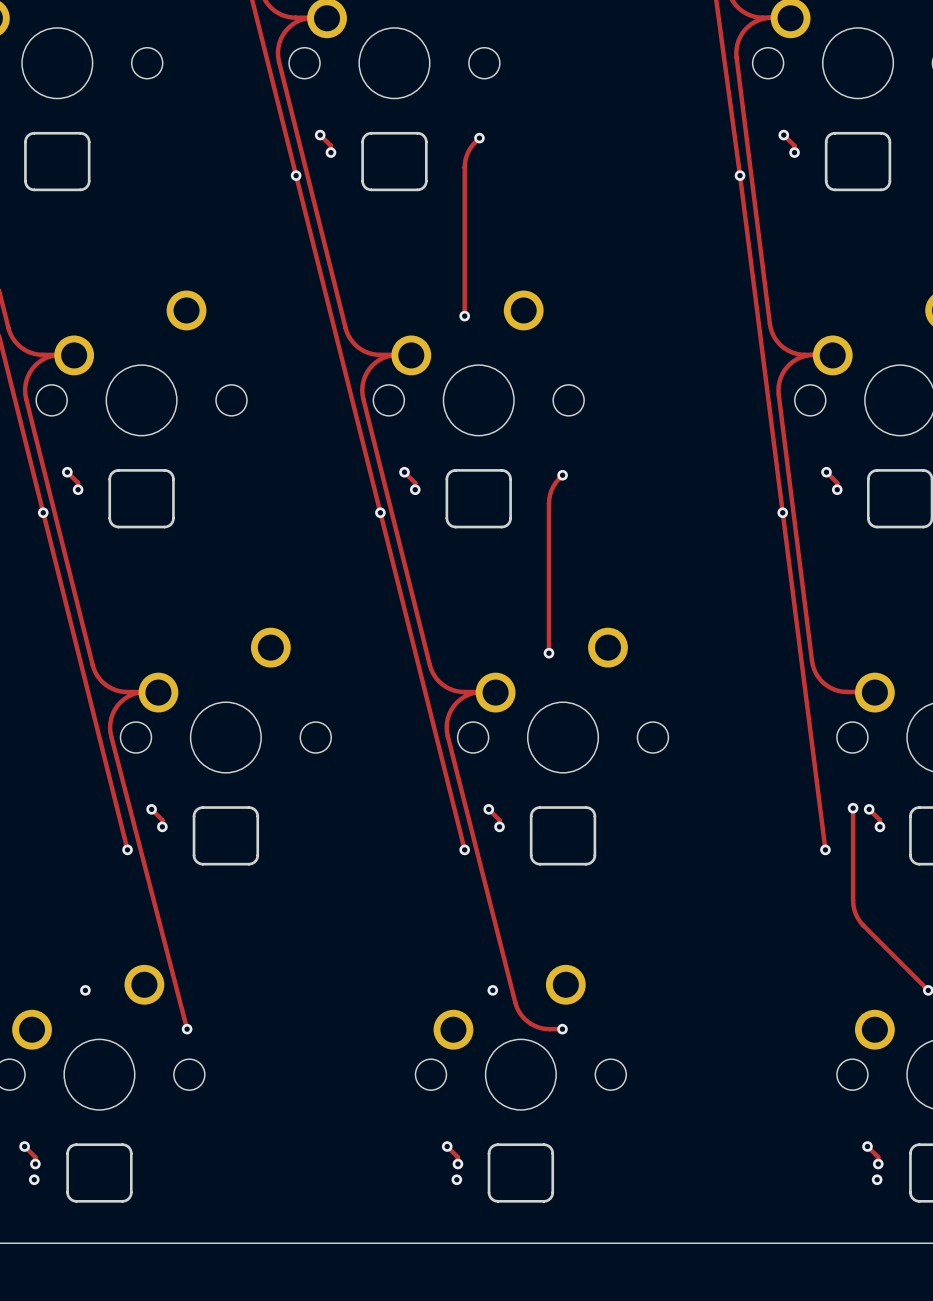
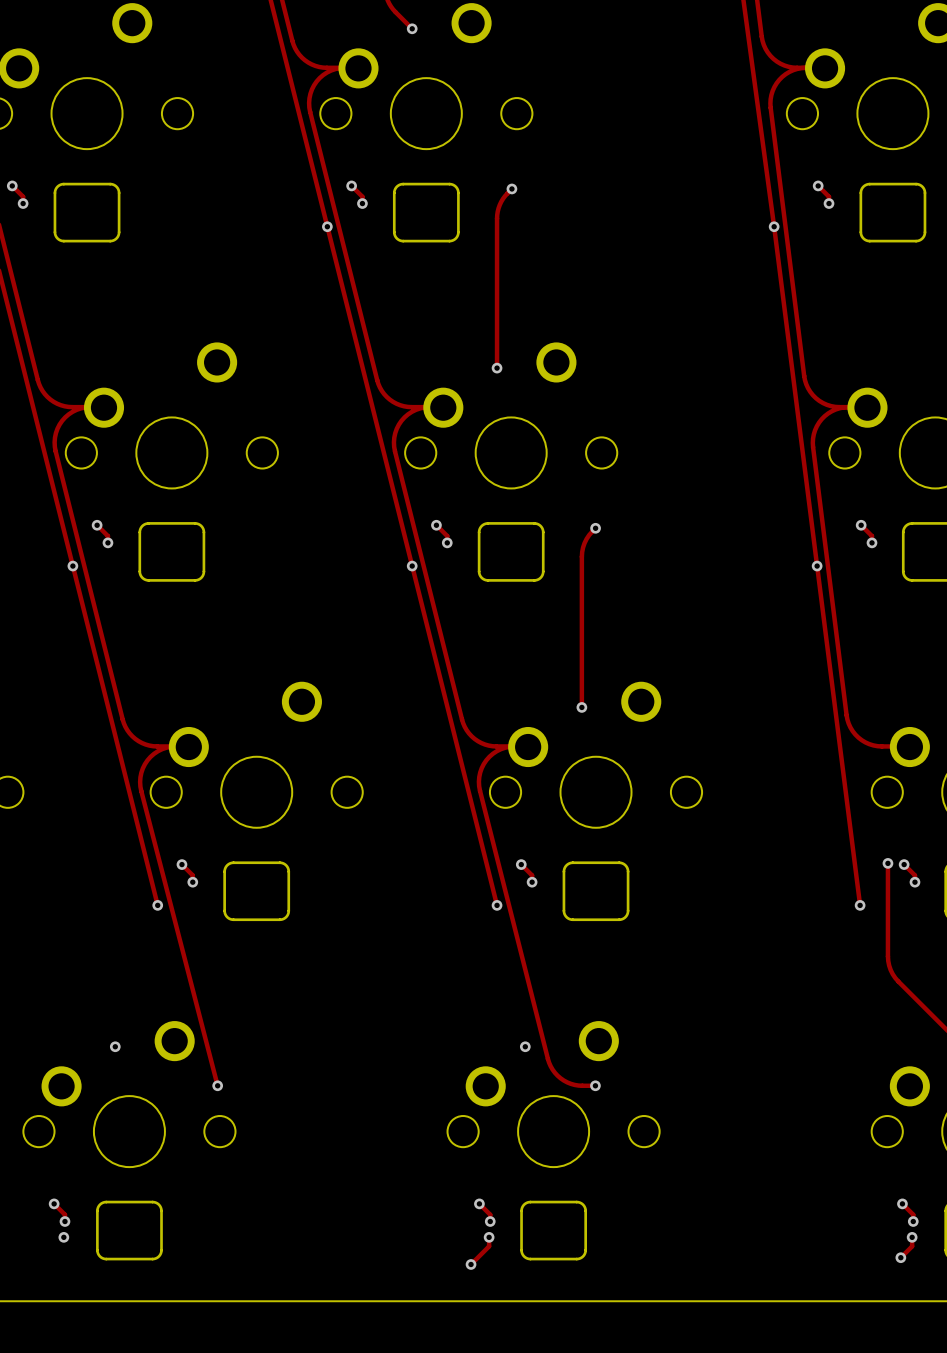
track: none -> (489, 1237) (489, 1246) (471, 1264)
track: none -> (912, 1237) (912, 1246) (900, 1257)
via: none -> (900, 1257)
via: none -> (471, 1264)

